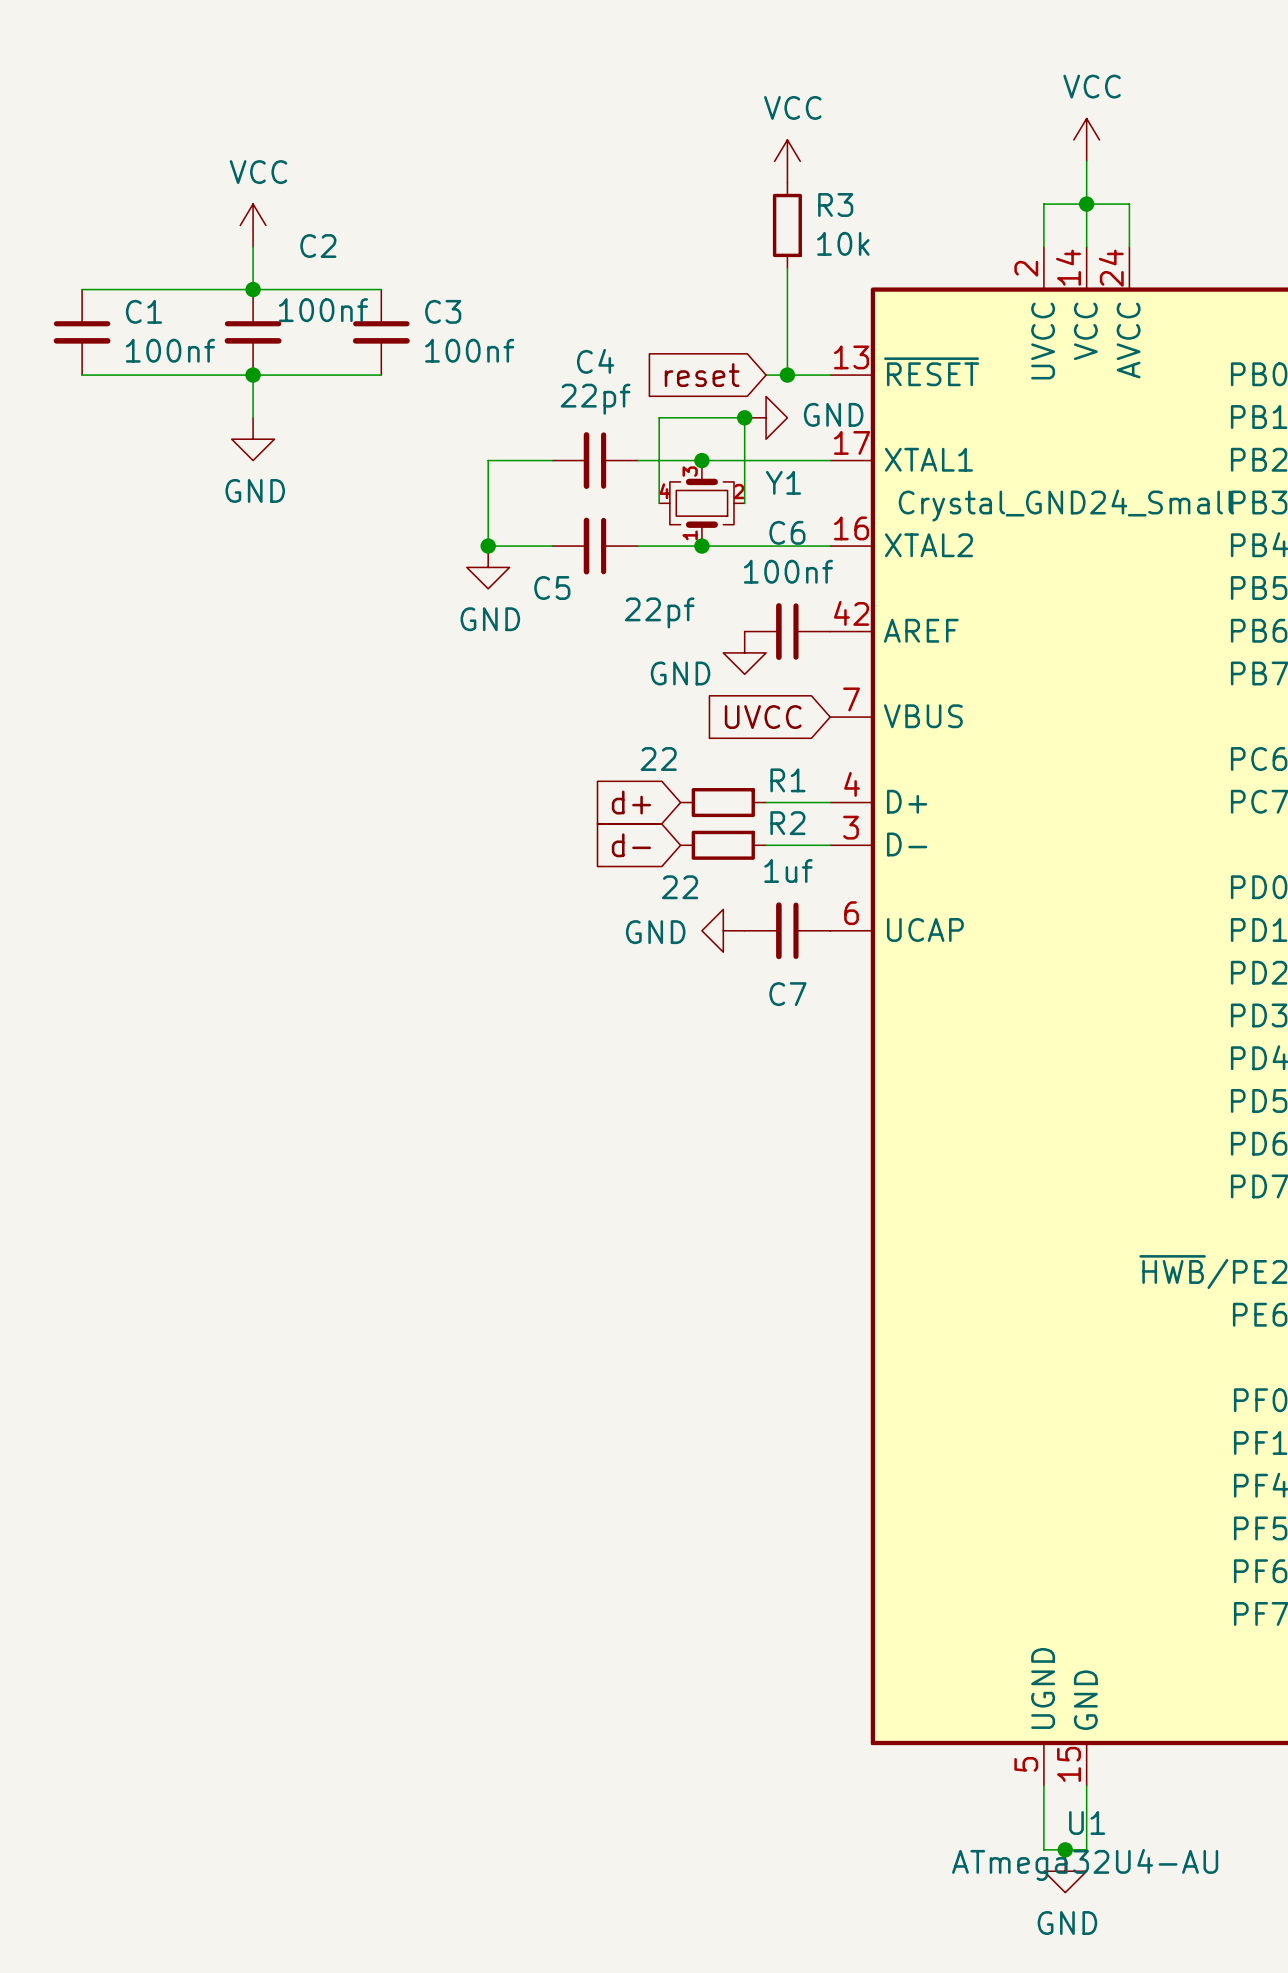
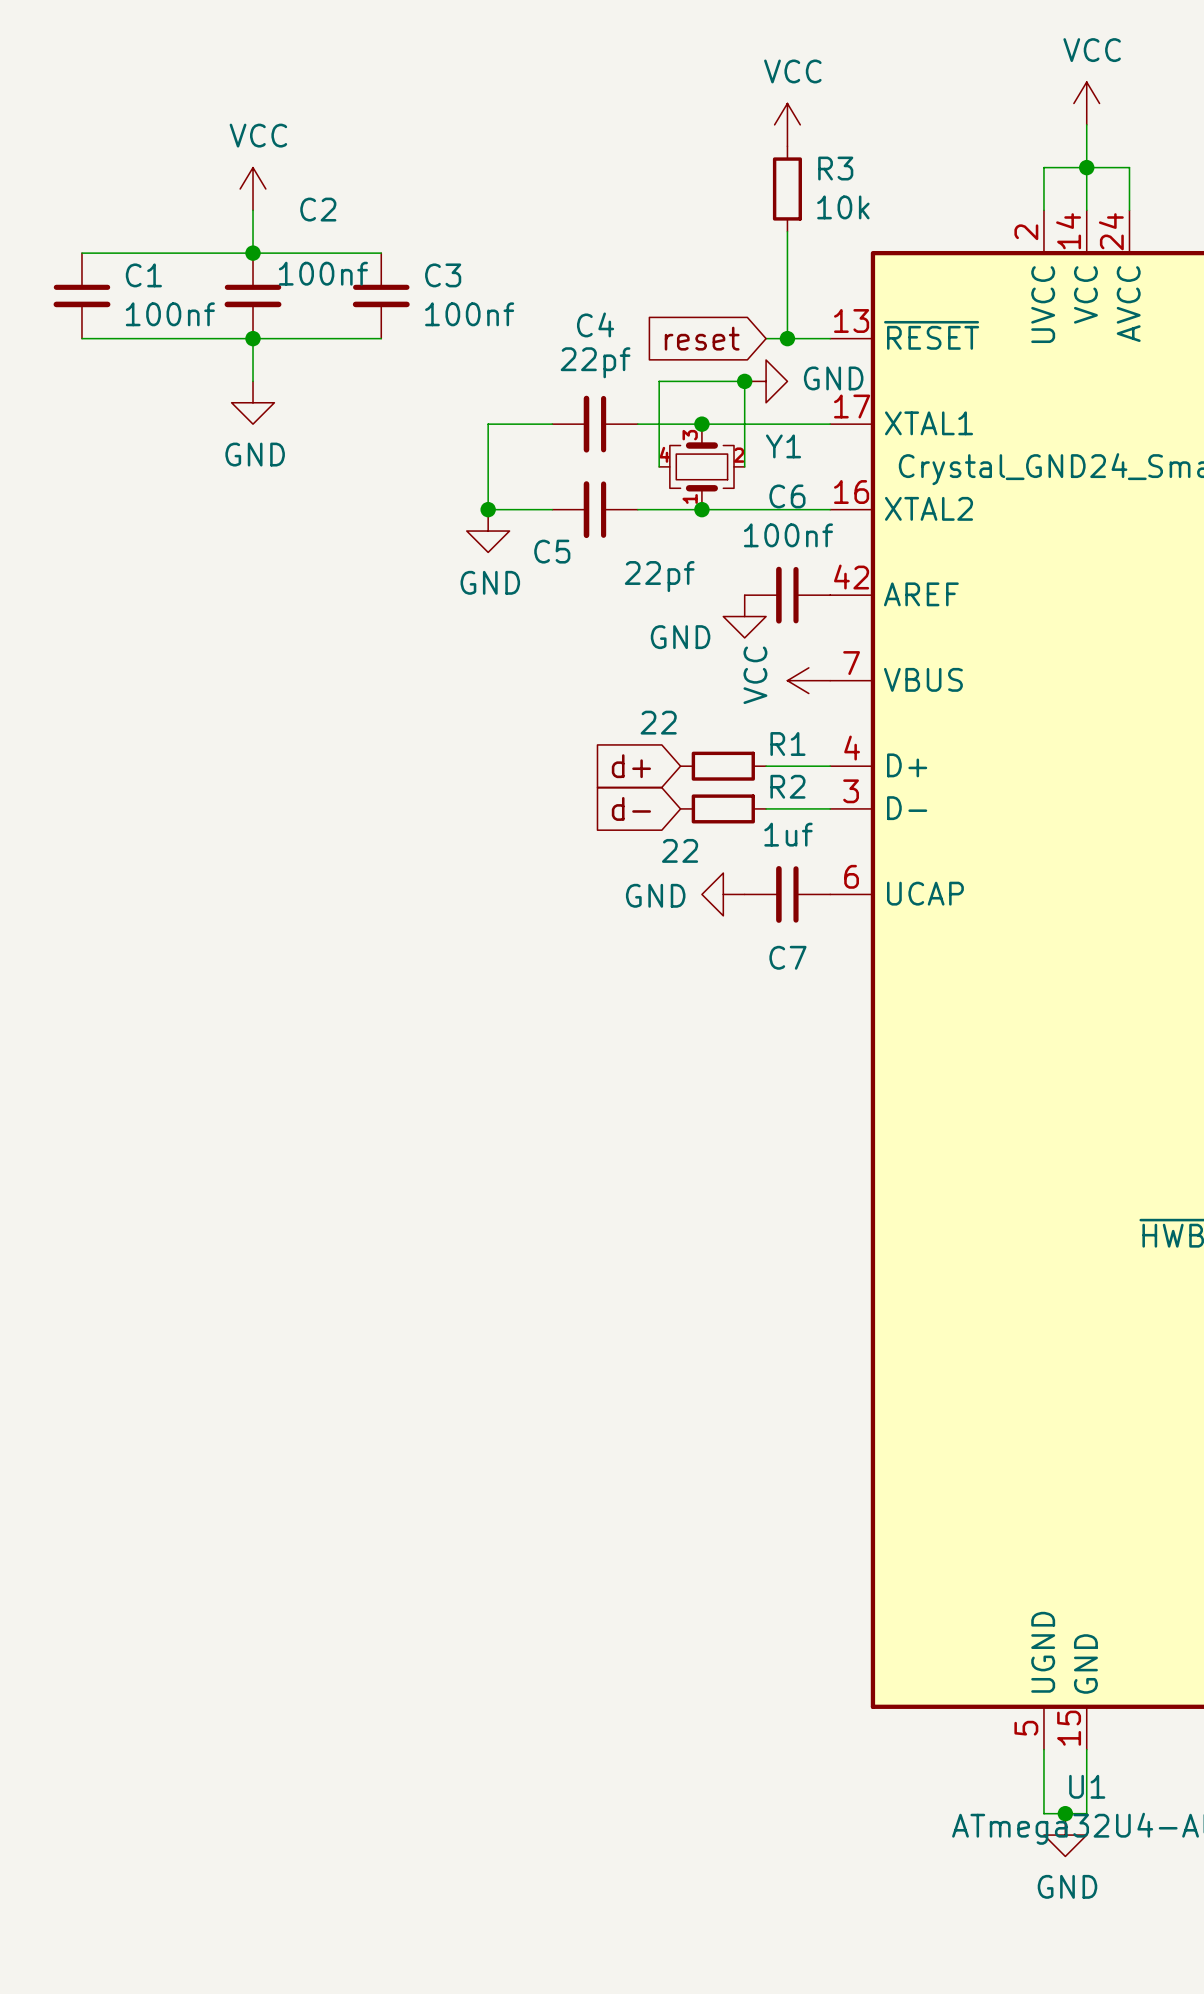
global label: UVCC (763, 717) -> none
power symbol: none -> VCC (808, 680)

